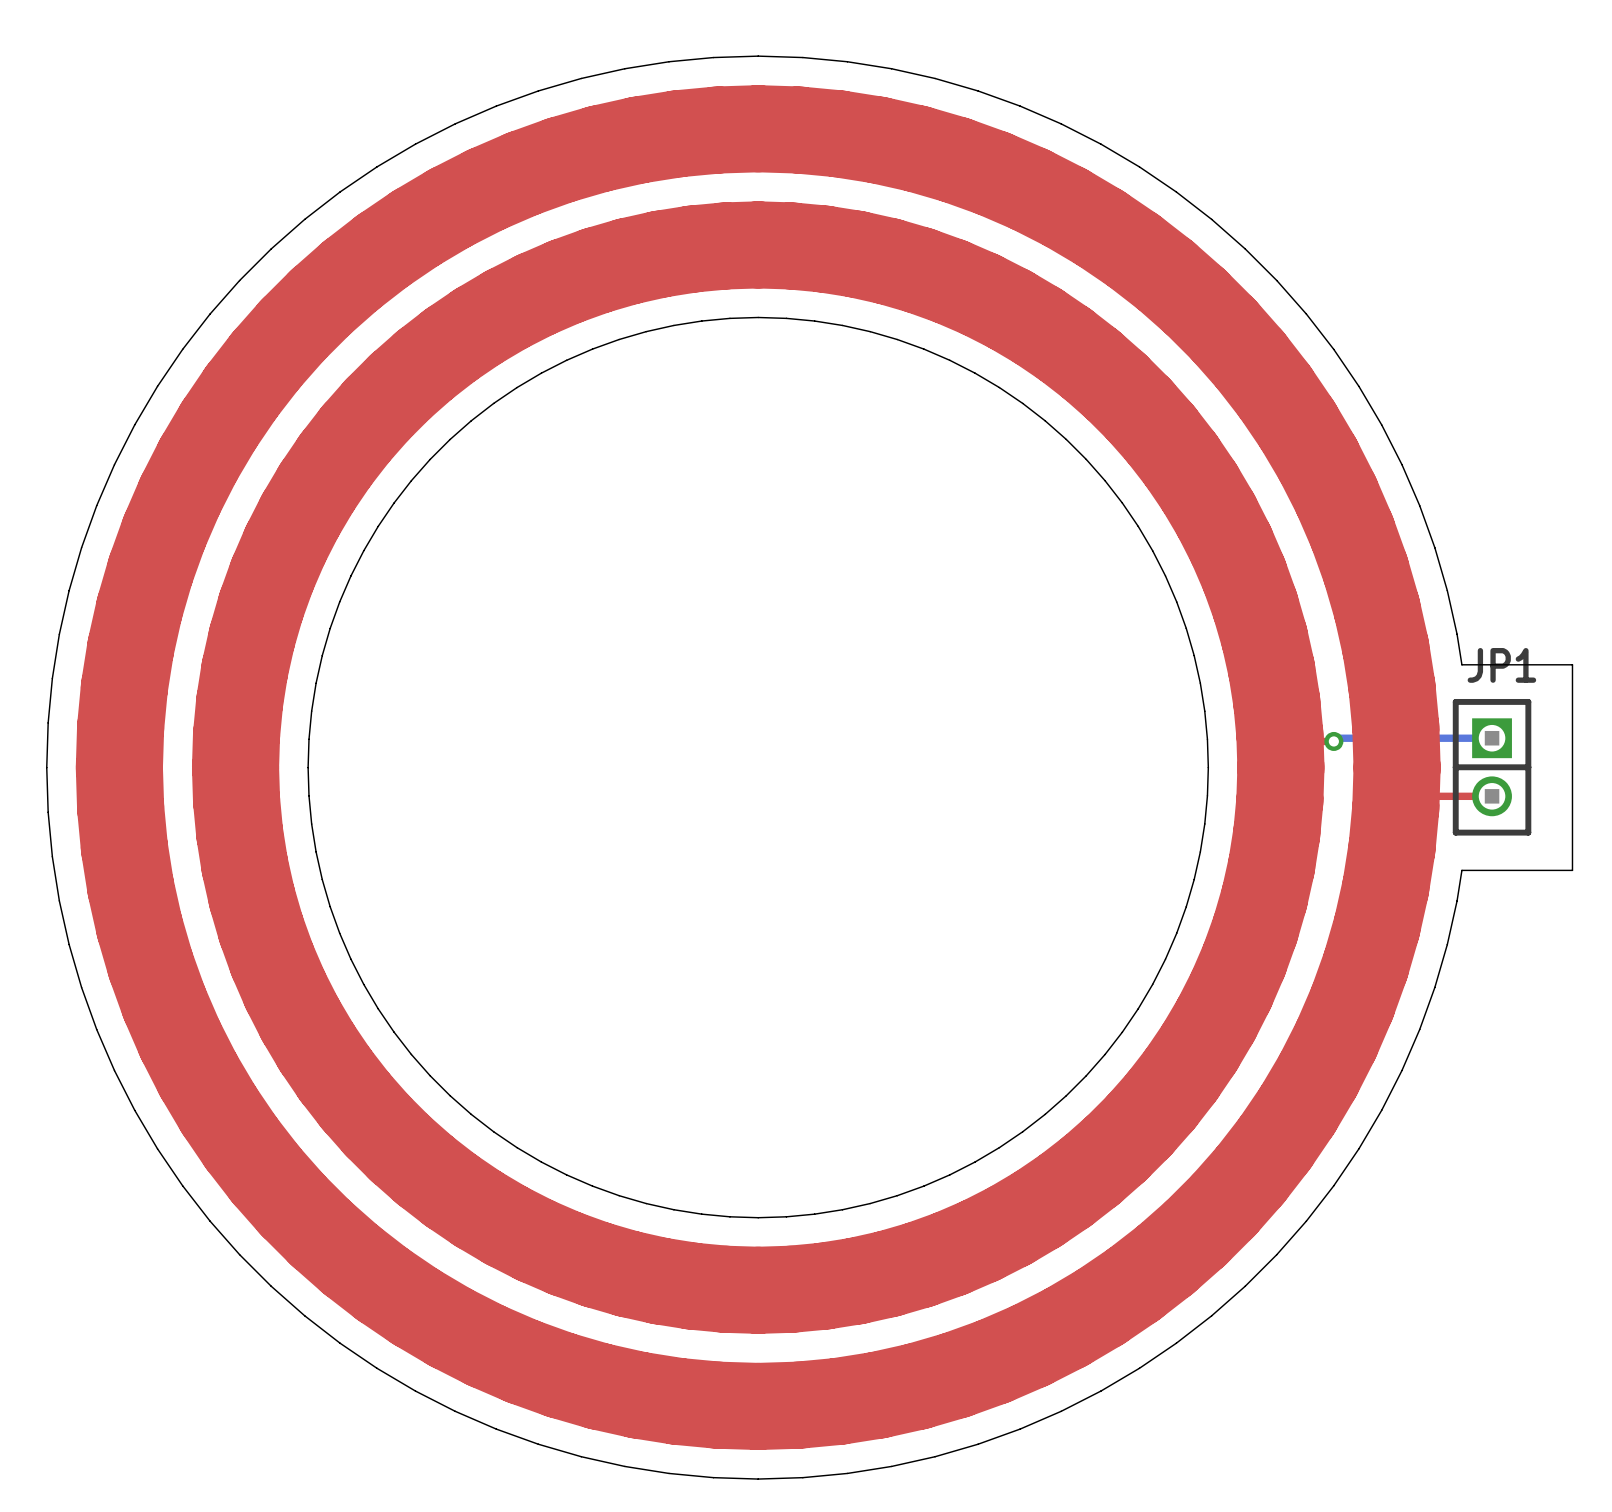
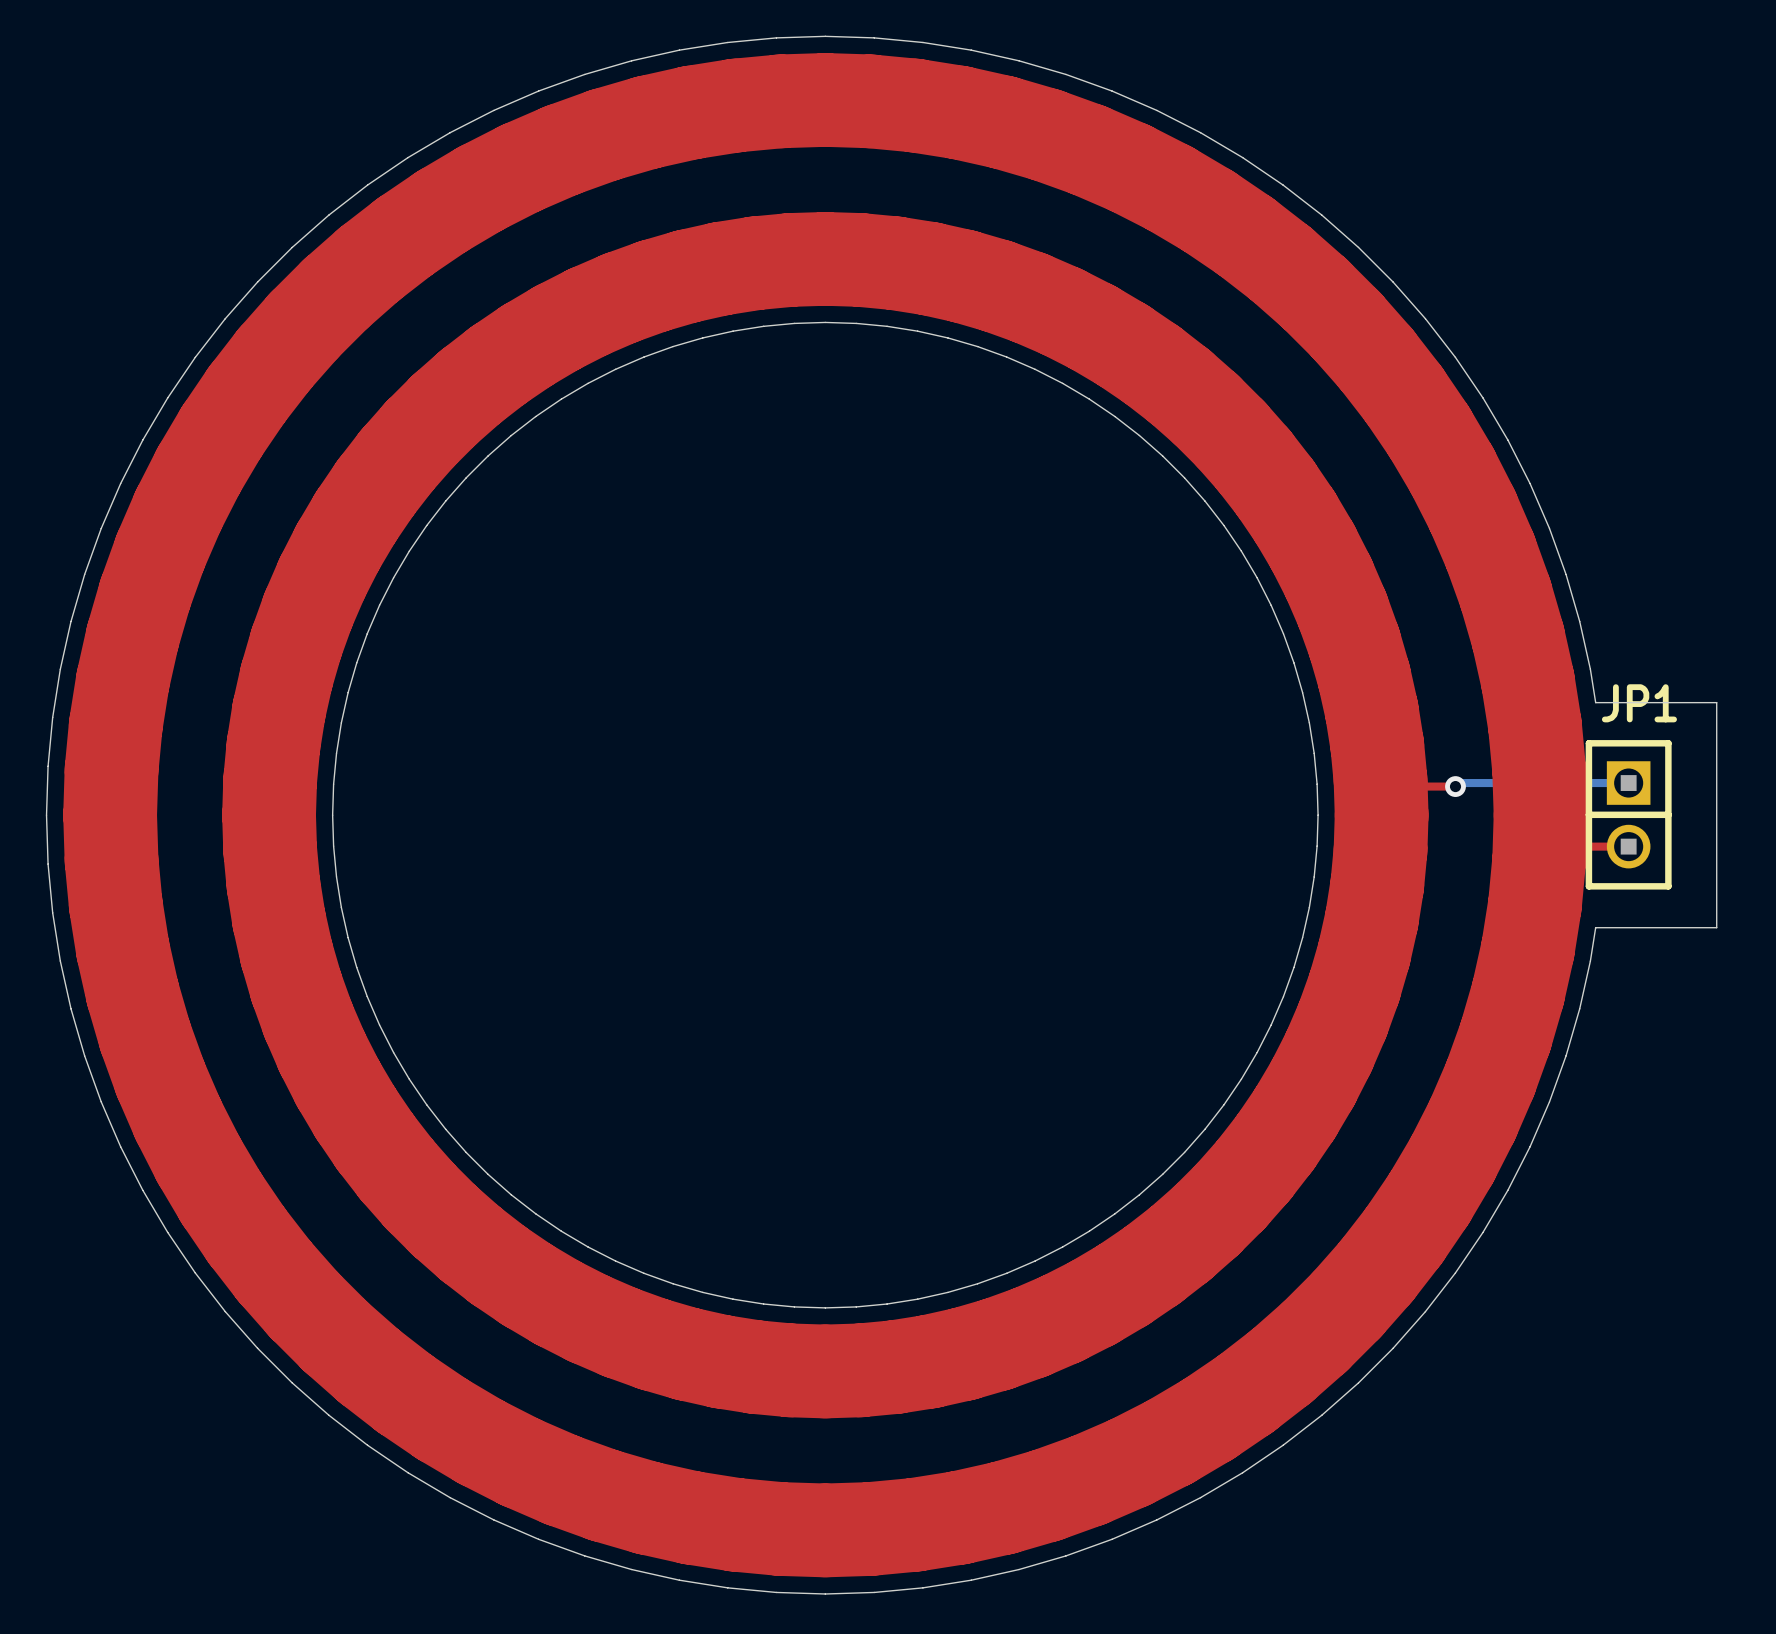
top track: (1279, 734) (1276, 702) (1264, 637) (1244, 575) (1231, 545) (1199, 487) (1181, 460) (1139, 409) (1091, 364) (1038, 326) (1010, 309) (950, 281) (919, 270) (856, 254) (823, 249) (791, 245) (725, 245) (692, 249) (628, 261) (565, 281) (535, 294) (478, 326) (450, 344) (400, 386) (355, 434) (316, 487) (300, 515) (272, 575) (261, 606) (244, 669) (239, 702) (236, 734) (236, 800) (239, 833) (251, 897) (272, 960) (285, 990) (316, 1047) (335, 1074) (377, 1125) (425, 1170) (478, 1208) (506, 1225) (565, 1253) (596, 1264) (660, 1281) (692, 1286) (725, 1289) (791, 1289) (823, 1286) (888, 1273) (950, 1253) (980, 1240) (1038, 1208) (1065, 1190) (1116, 1148) (1160, 1100) (1199, 1047) (1216, 1019) (1244, 960) (1255, 929) (1271, 865) (1276, 833) (1279, 800) (1279, 734) -> (1380, 780) (1371, 710) (1354, 643) (1328, 578) (1312, 547) (1275, 488) (1253, 460) (1230, 434) (1179, 386) (1152, 365) (1093, 327) (1062, 311) (997, 286) (963, 276) (895, 263) (860, 259) (790, 259) (721, 268) (653, 286) (588, 311) (557, 327) (498, 365) (470, 386) (444, 409) (396, 460) (375, 488) (337, 547) (322, 578) (296, 643) (286, 676) (273, 745) (270, 780) (270, 850) (278, 919) (296, 987) (322, 1052) (337, 1083) (375, 1142) (396, 1169) (419, 1195) (470, 1243) (498, 1265) (557, 1302) (588, 1318) (653, 1344) (687, 1353) (755, 1367) (790, 1370) (860, 1370) (929, 1361) (997, 1344) (1062, 1318) (1093, 1302) (1152, 1265) (1179, 1243) (1230, 1195) (1253, 1169) (1275, 1142) (1312, 1083) (1328, 1052) (1354, 987) (1364, 953) (1377, 884) (1380, 850) (1380, 780)
top track: (1395, 807) (1385, 887) (1377, 926) (1352, 1002) (1336, 1039) (1297, 1109) (1275, 1143) (1223, 1204) (1165, 1259) (1133, 1284) (1065, 1327) (993, 1361) (955, 1375) (877, 1395) (838, 1401) (798, 1405) (718, 1405) (638, 1395) (599, 1386) (523, 1361) (486, 1345) (415, 1307) (382, 1284) (320, 1233) (265, 1174) (241, 1143) (198, 1075) (164, 1002) (150, 965) (130, 887) (124, 847) (120, 807) (120, 727) (130, 647) (139, 608) (164, 532) (180, 495) (218, 425) (241, 392) (292, 330) (350, 275) (382, 250) (450, 207) (523, 173) (560, 160) (638, 140) (678, 133) (718, 129) (798, 129) (877, 140) (917, 148) (993, 173) (1030, 189) (1100, 228) (1133, 250) (1195, 301) (1250, 360) (1275, 392) (1318, 459) (1352, 532) (1365, 570) (1385, 647) (1392, 687) (1395, 727) (1395, 807) -> (1539, 860) (1527, 949) (1518, 993) (1505, 1036) (1472, 1119) (1429, 1198) (1404, 1235) (1346, 1304) (1314, 1336) (1245, 1393) (1208, 1419) (1129, 1462) (1046, 1495) (959, 1517) (915, 1524) (825, 1530) (780, 1529) (691, 1517) (647, 1507) (604, 1495) (520, 1462) (442, 1419) (404, 1393) (335, 1336) (303, 1304) (246, 1235) (221, 1198) (178, 1119) (145, 1036) (122, 949) (115, 904) (110, 815) (111, 770) (122, 681) (132, 637) (145, 594) (178, 510) (221, 431) (246, 394) (303, 325) (335, 293) (404, 236) (442, 211) (520, 168) (604, 134) (691, 112) (735, 105) (825, 99) (870, 101) (959, 112) (1003, 122) (1046, 134) (1129, 168) (1208, 211) (1245, 236) (1314, 293) (1346, 325) (1404, 394) (1429, 431) (1472, 510) (1505, 594) (1527, 681) (1534, 725) (1540, 815) (1539, 860)

